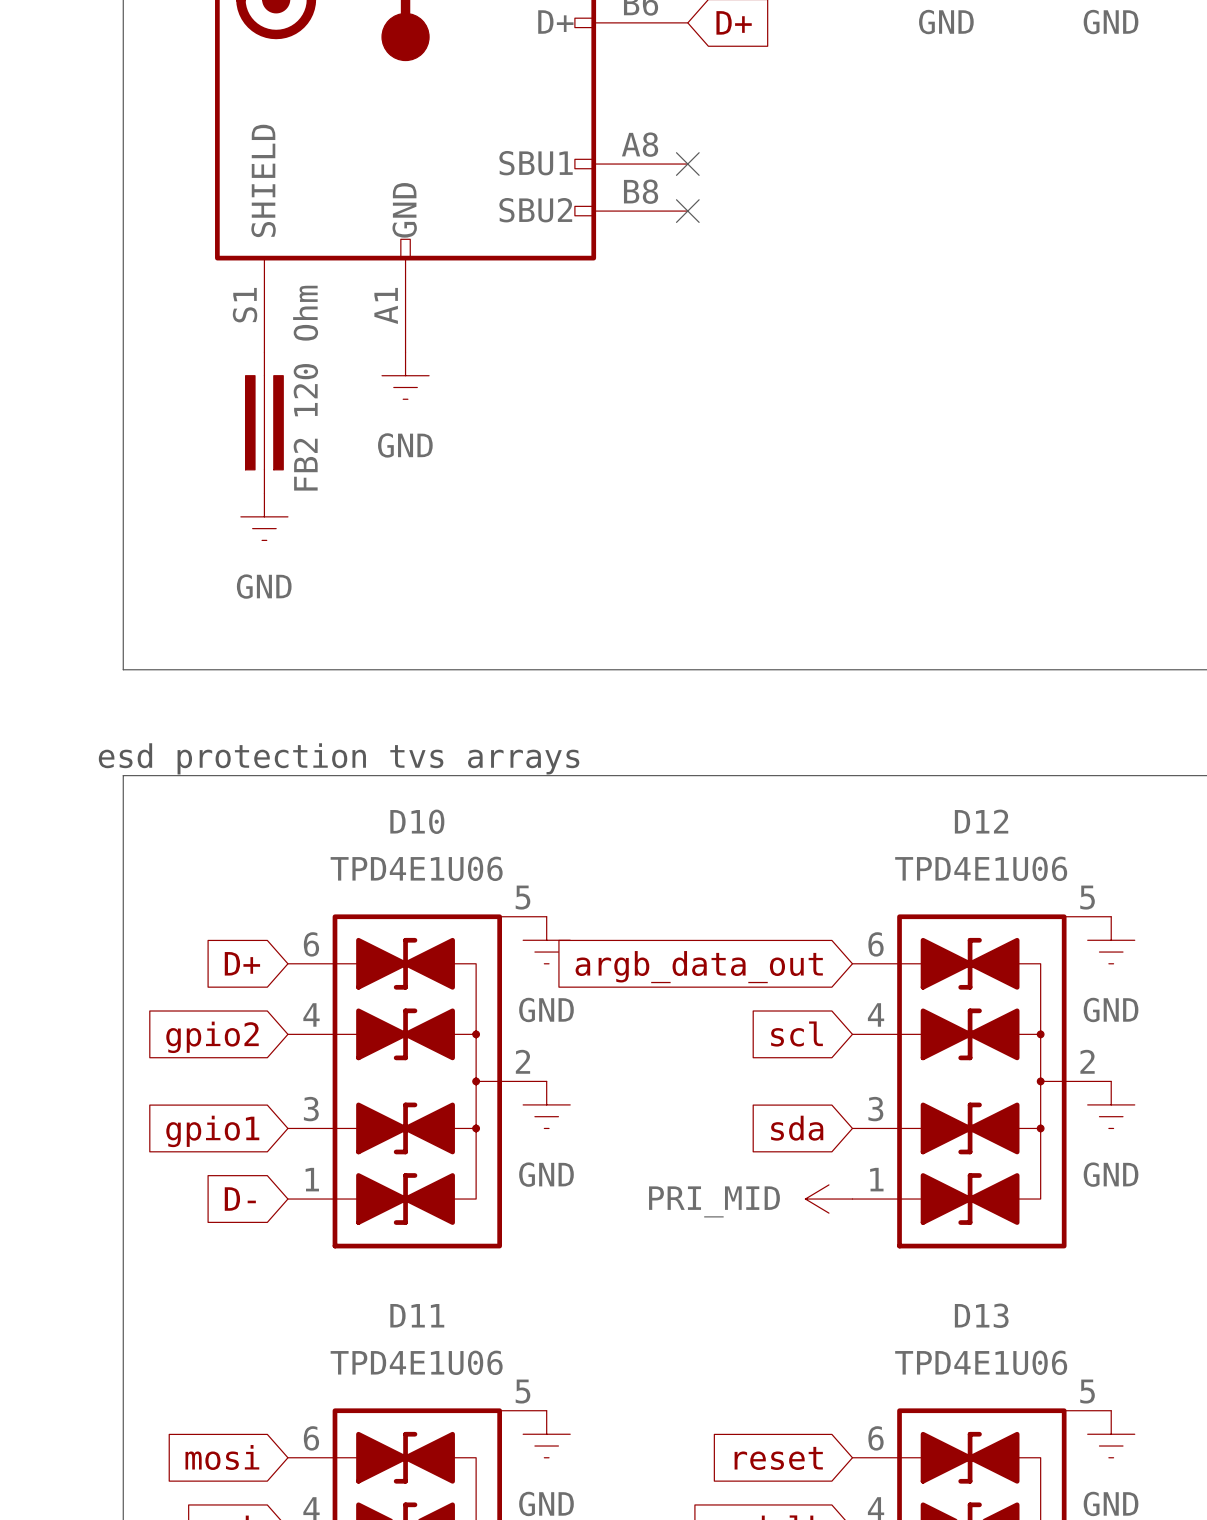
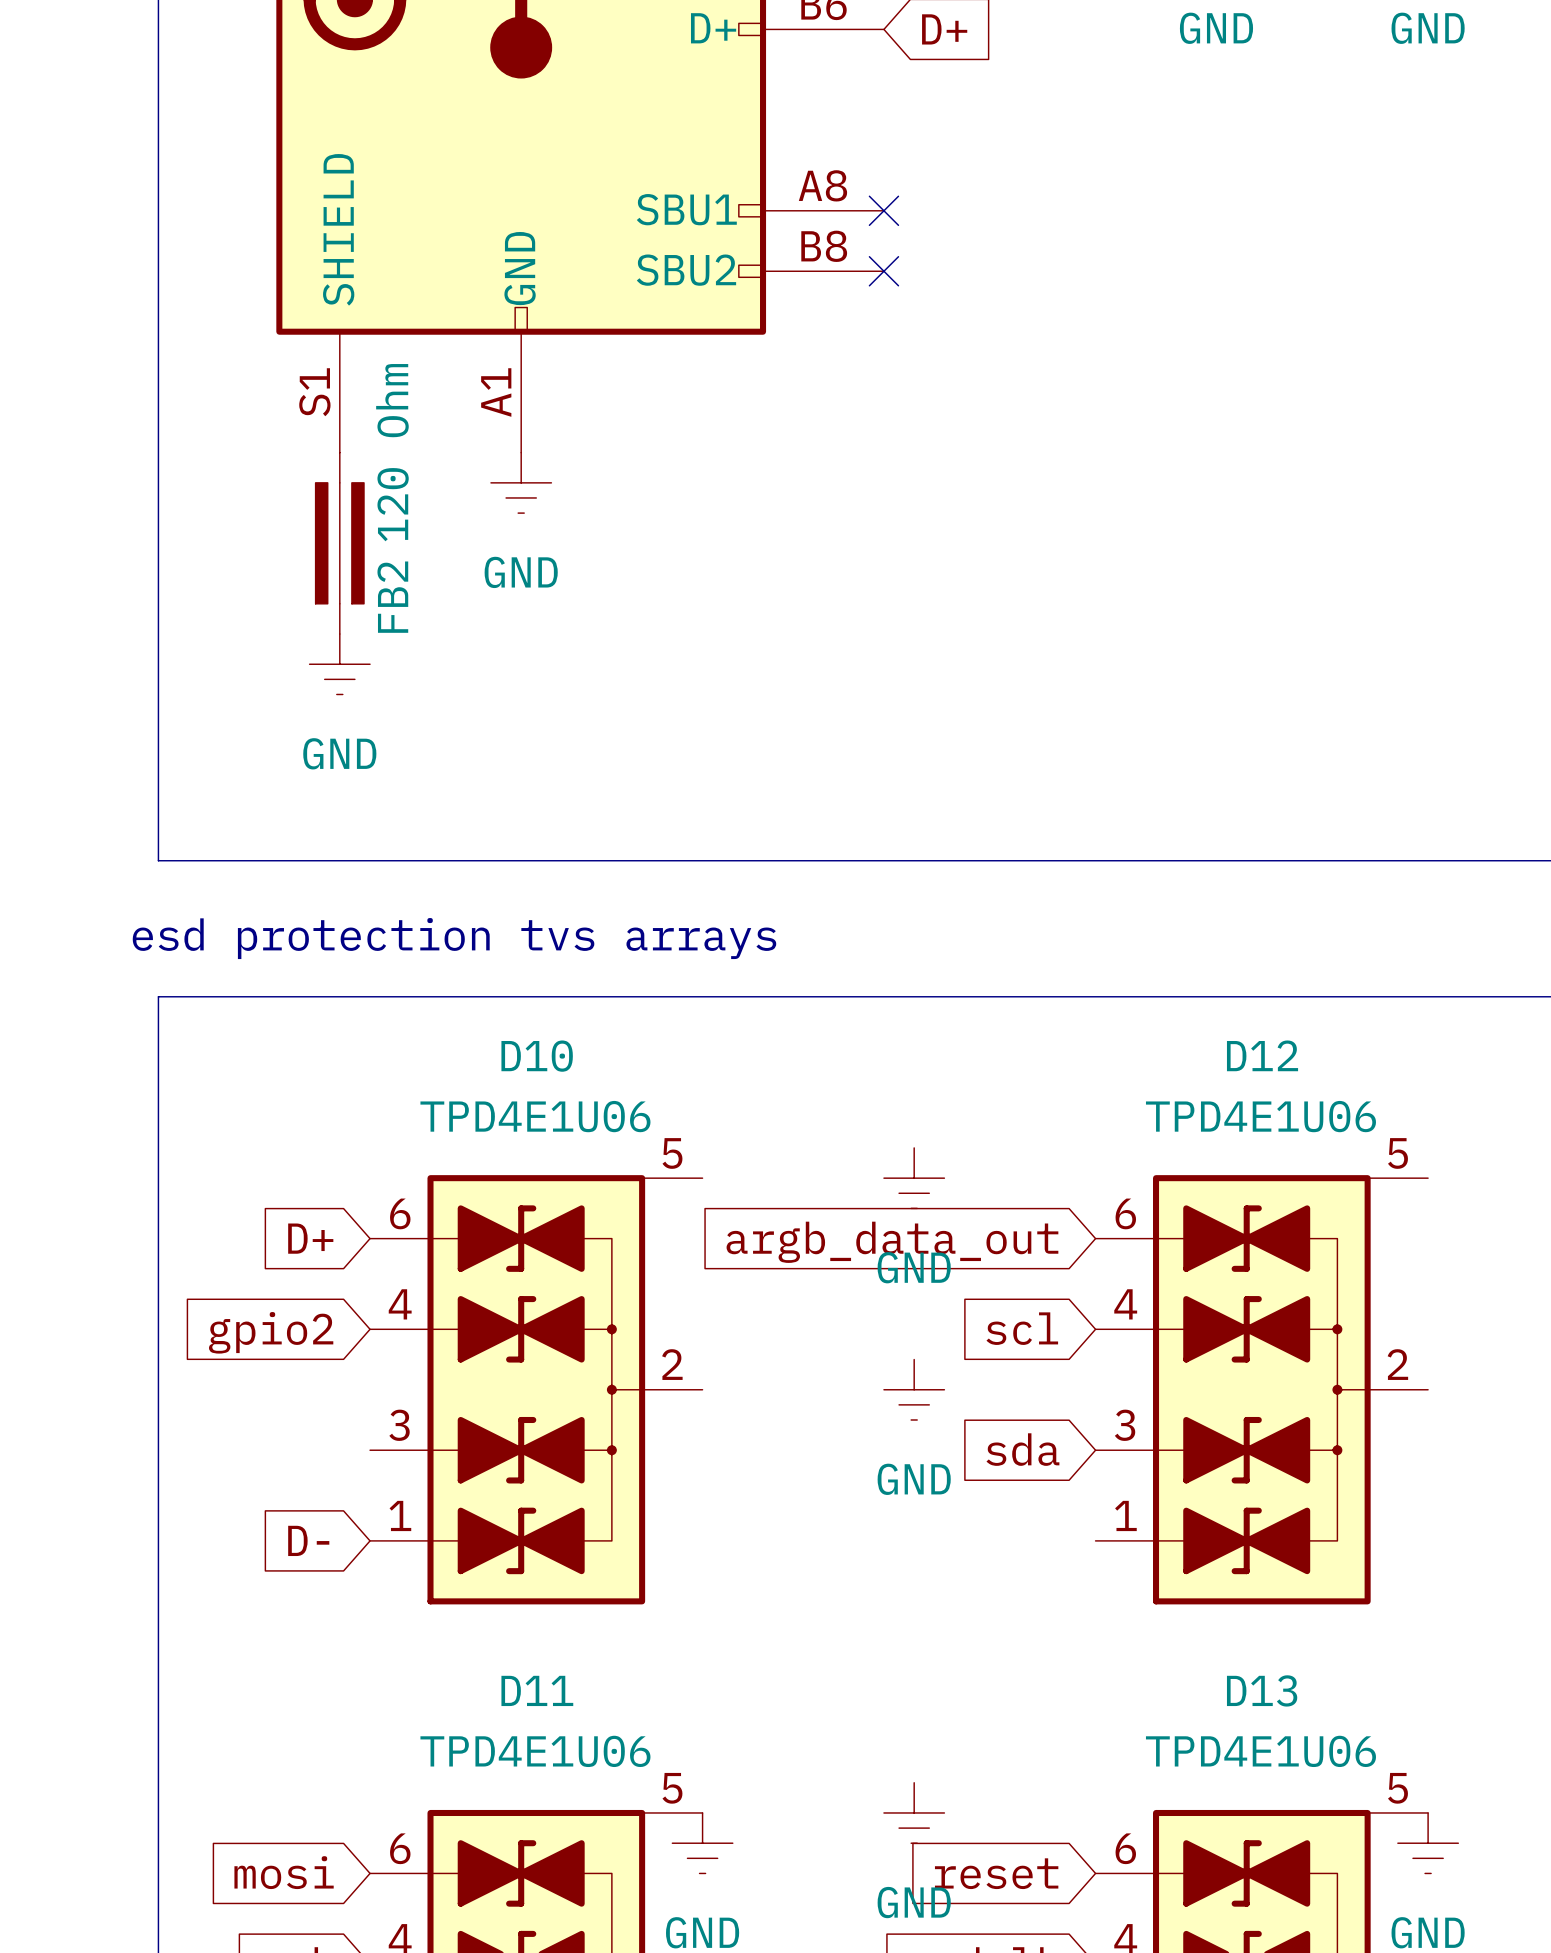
text position: esd protection tvs arrays (339, 758) -> esd protection tvs arrays (454, 938)
power symbol: none -> GND (914, 1178)
power symbol: GND (546, 940) -> none
power symbol: GND (1111, 940) -> none
power symbol: none -> GND (914, 1389)
power symbol: GND (546, 1104) -> none
power symbol: GND (1111, 1104) -> none
global label: gpio1 (212, 1131) -> none
power symbol: PRI_MID (828, 1199) -> none
power symbol: none -> GND (914, 1812)

